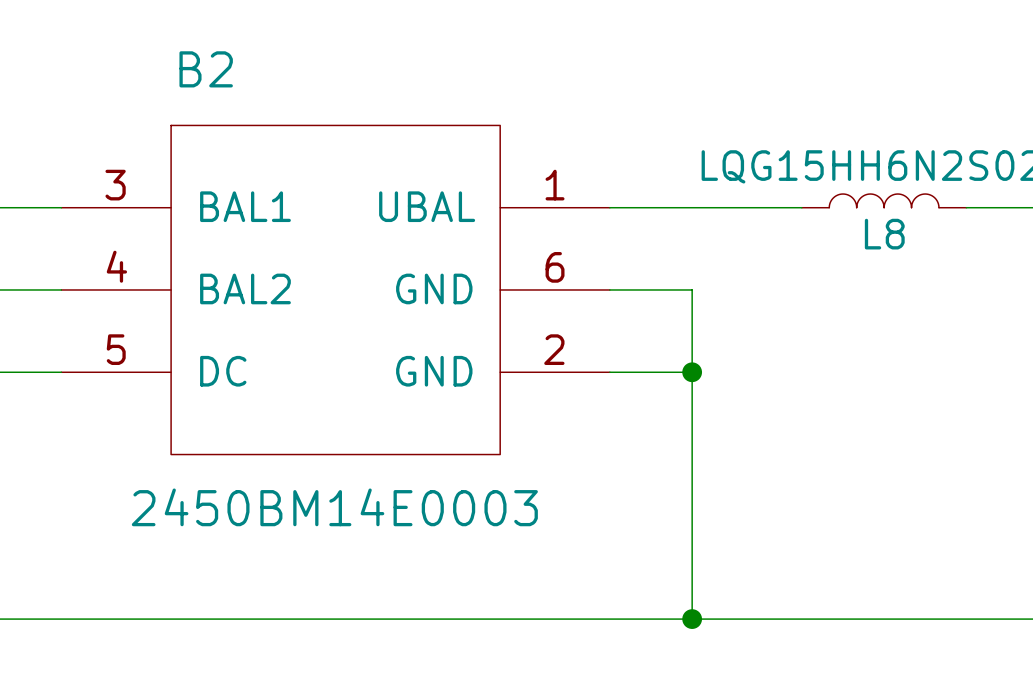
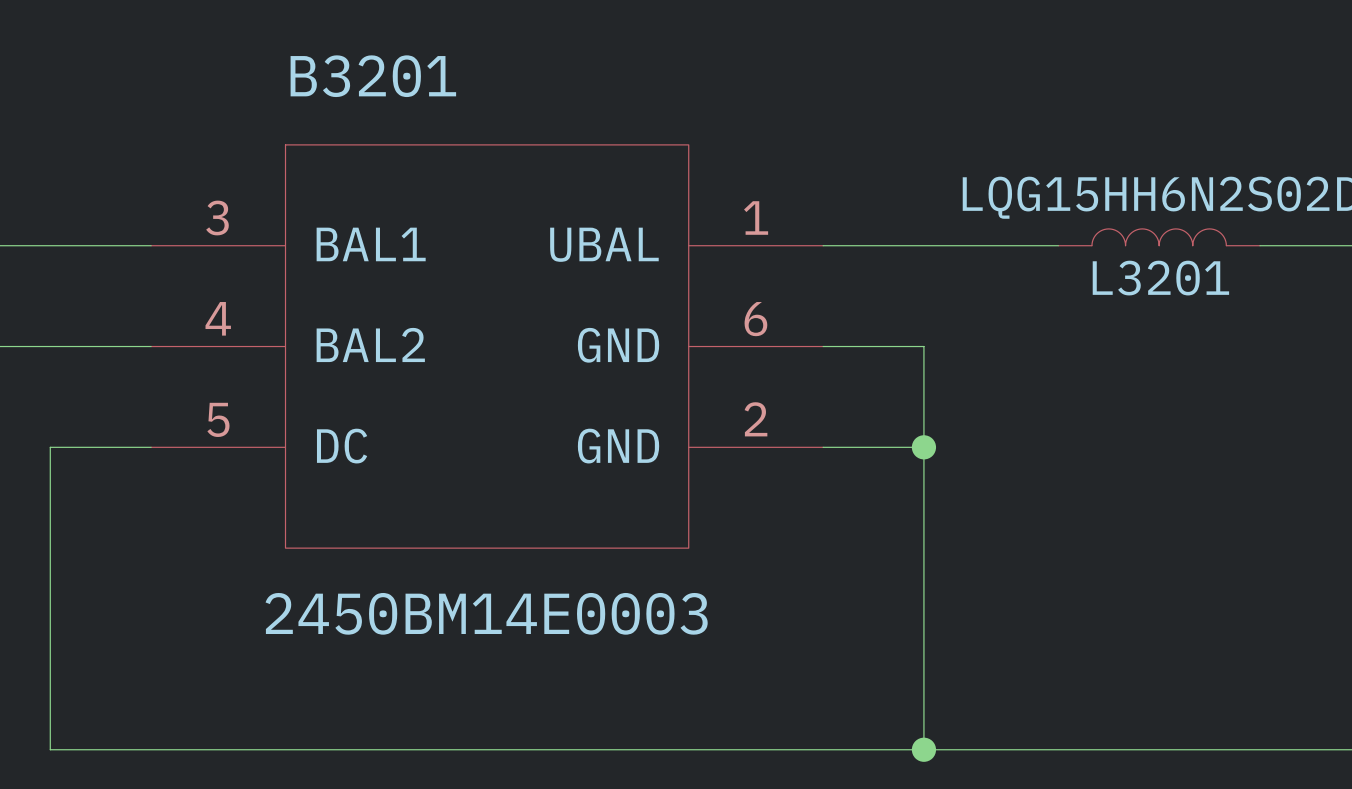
B2 name: B2 (206, 69) -> B3201 (373, 76)
L8 name: L8 (884, 234) -> L3201 (1160, 278)

